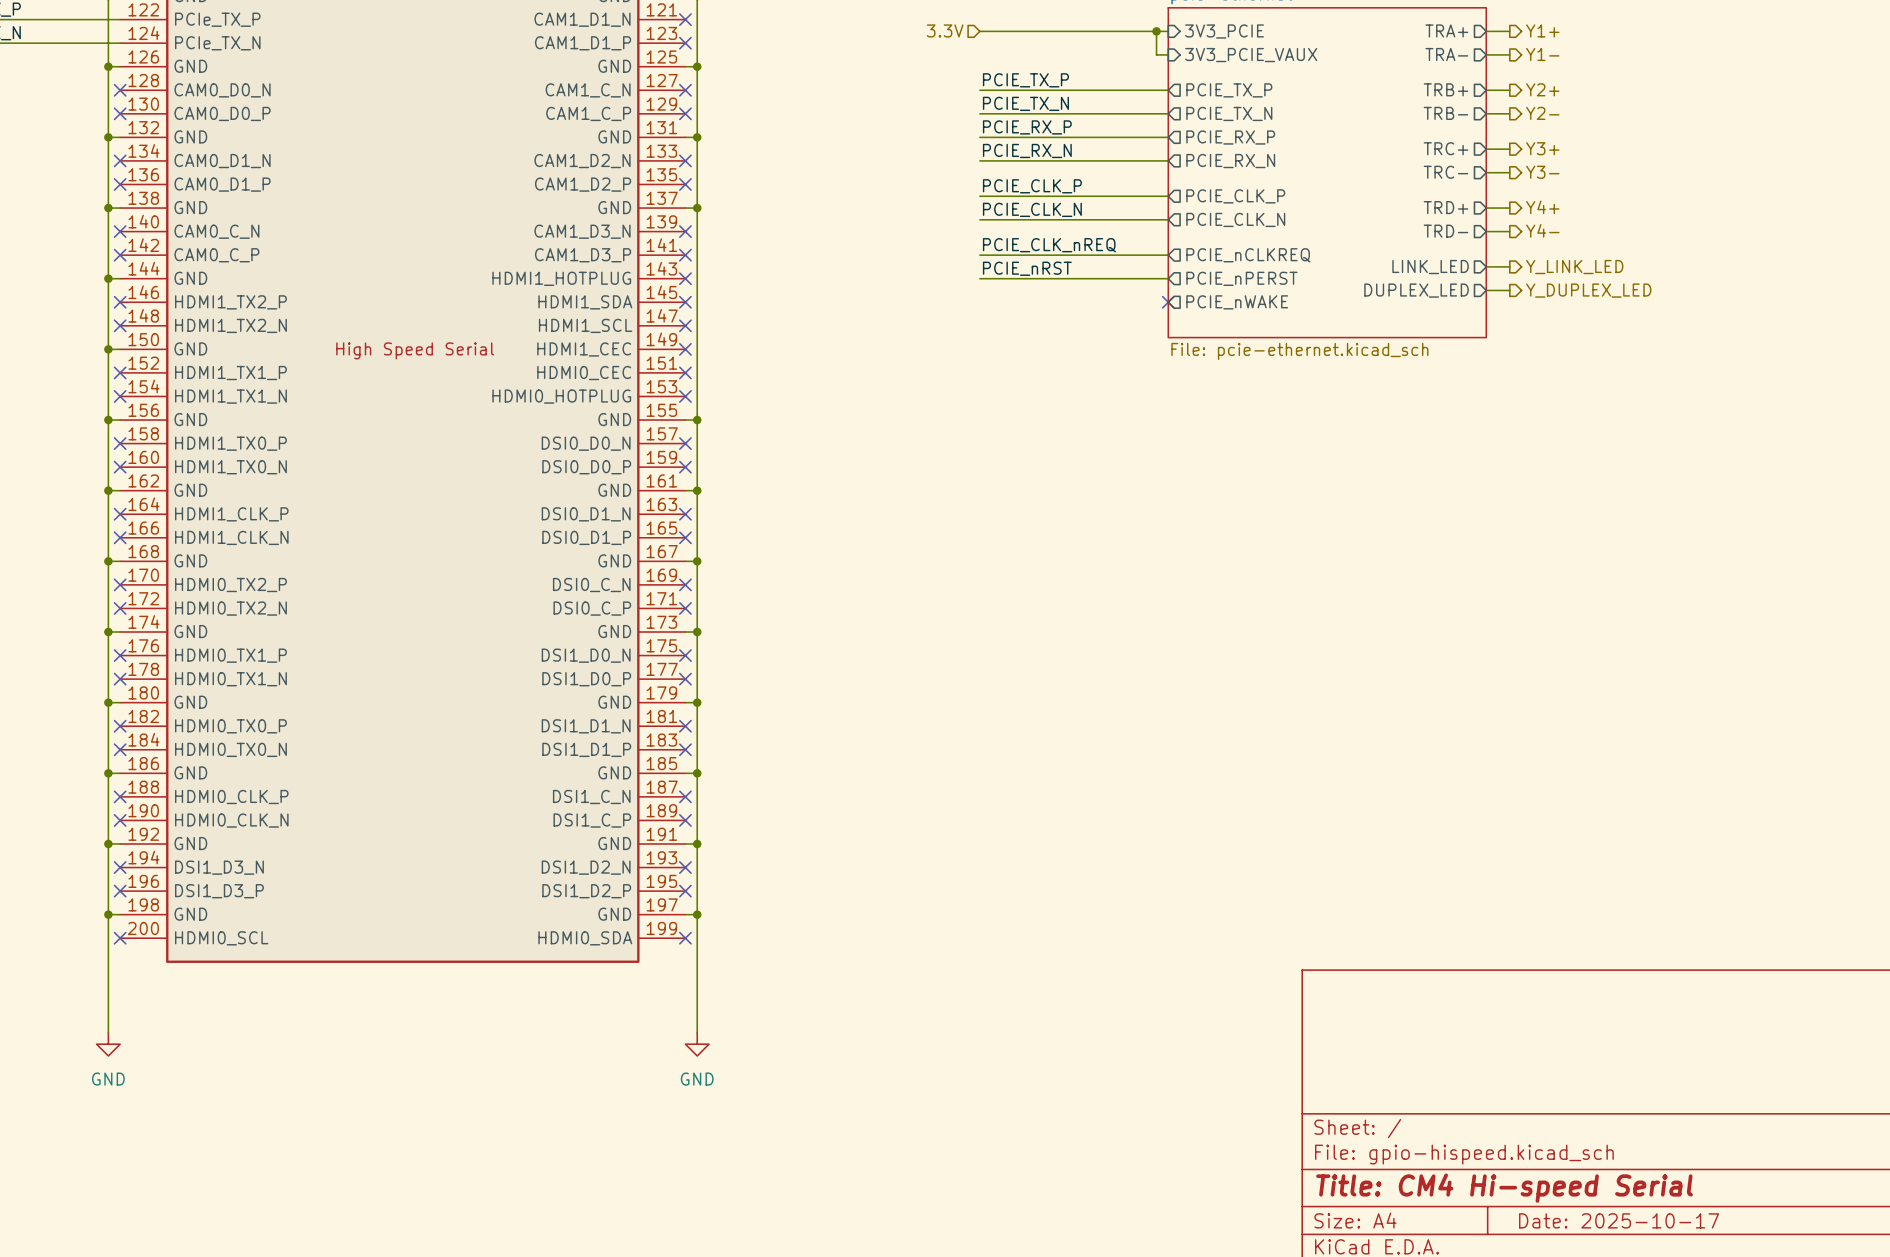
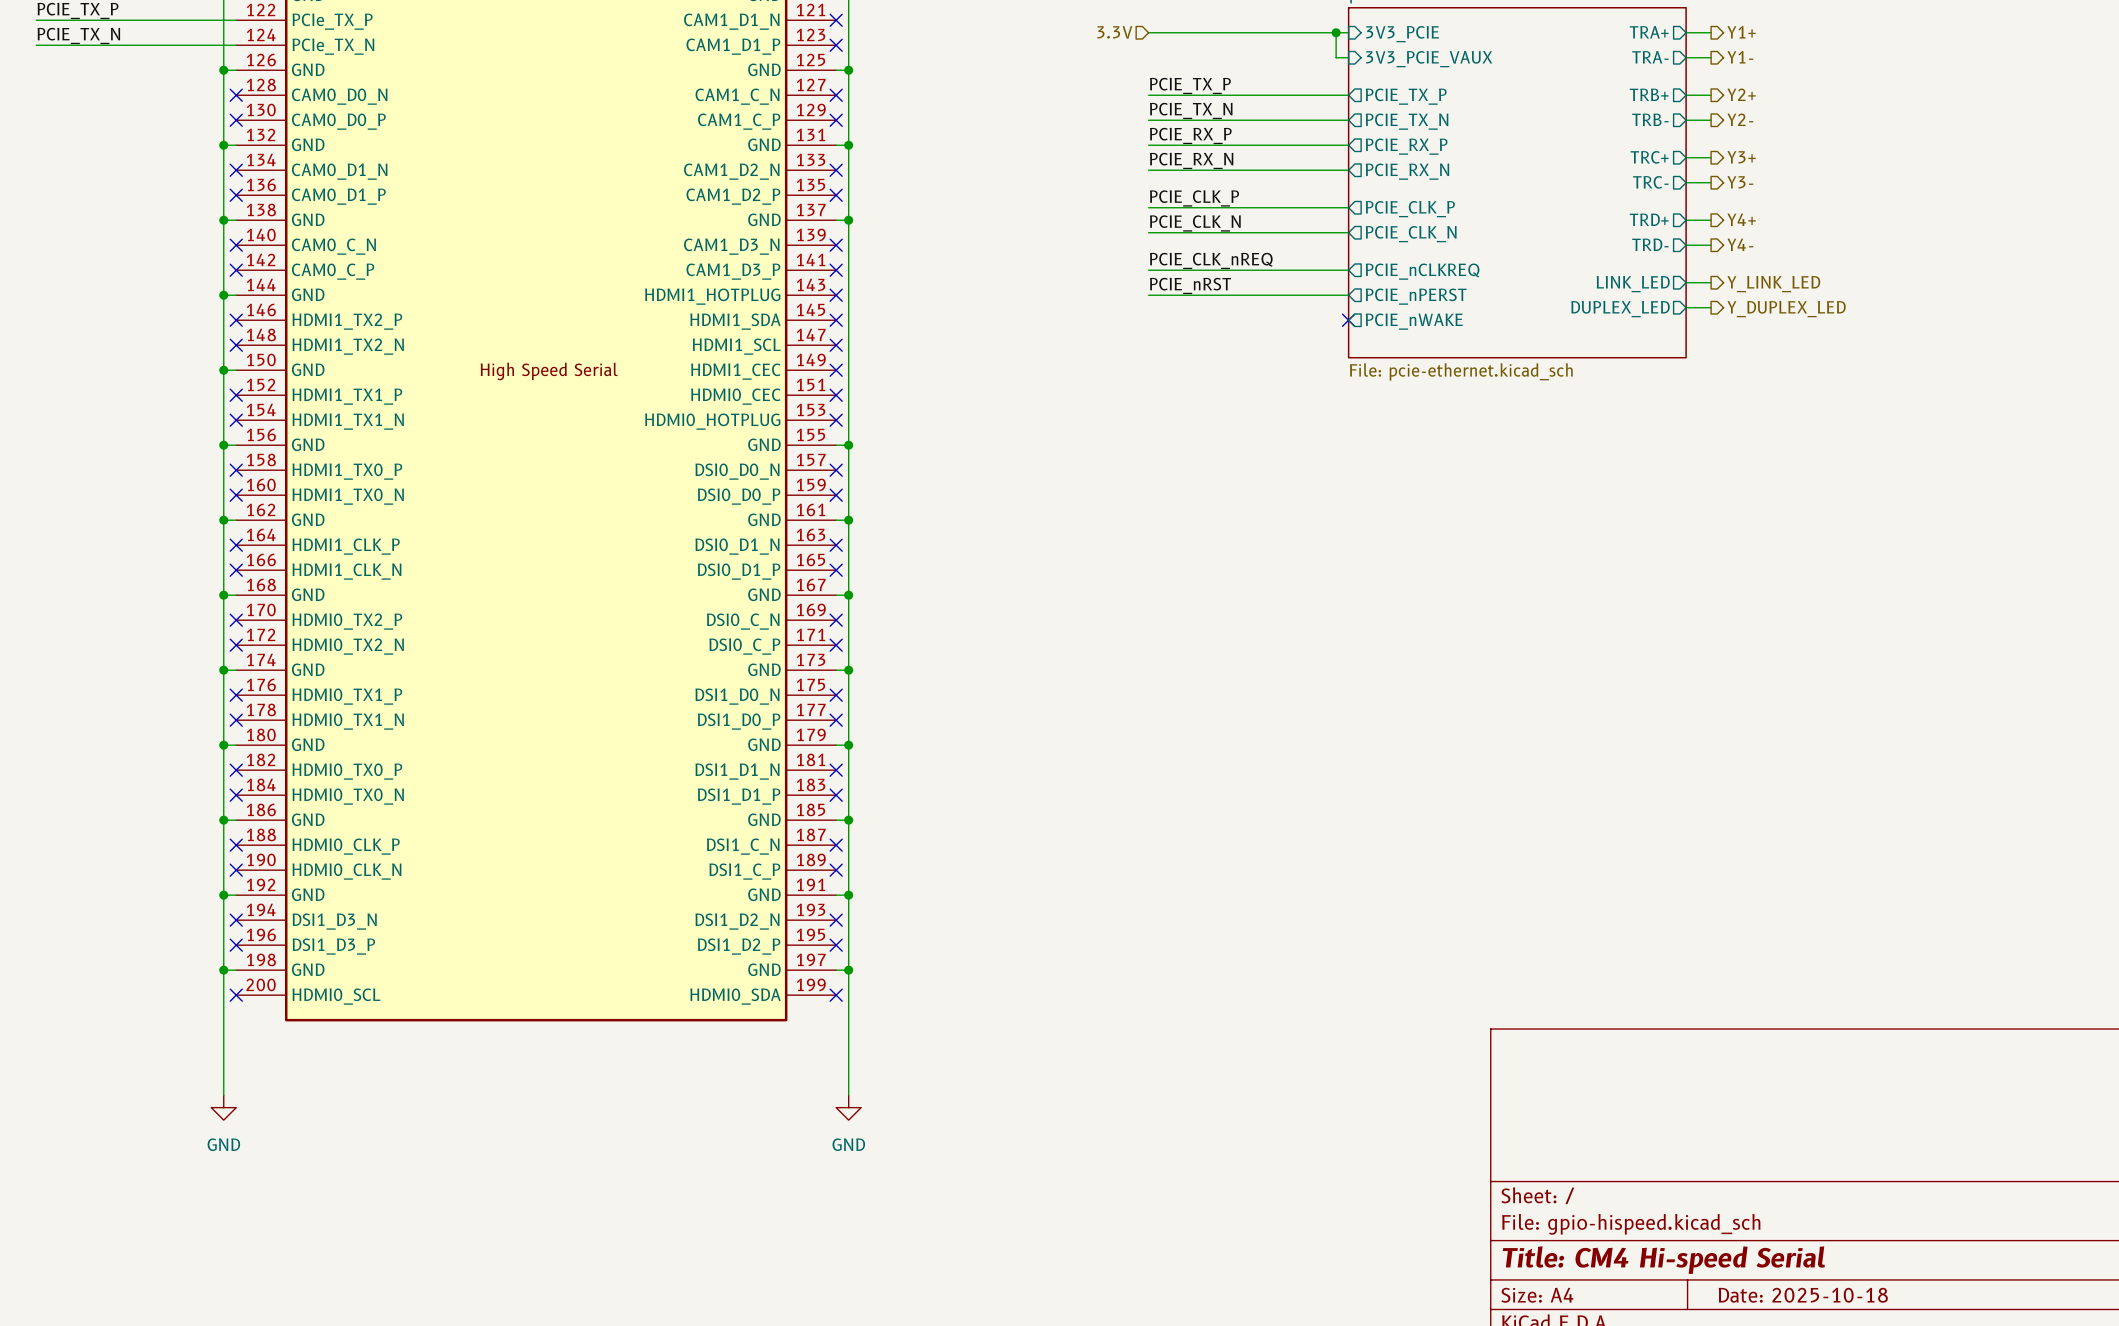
title block: Date: 2025-10-17 (1619, 1220) -> Date: 2025-10-18 (1803, 1295)

